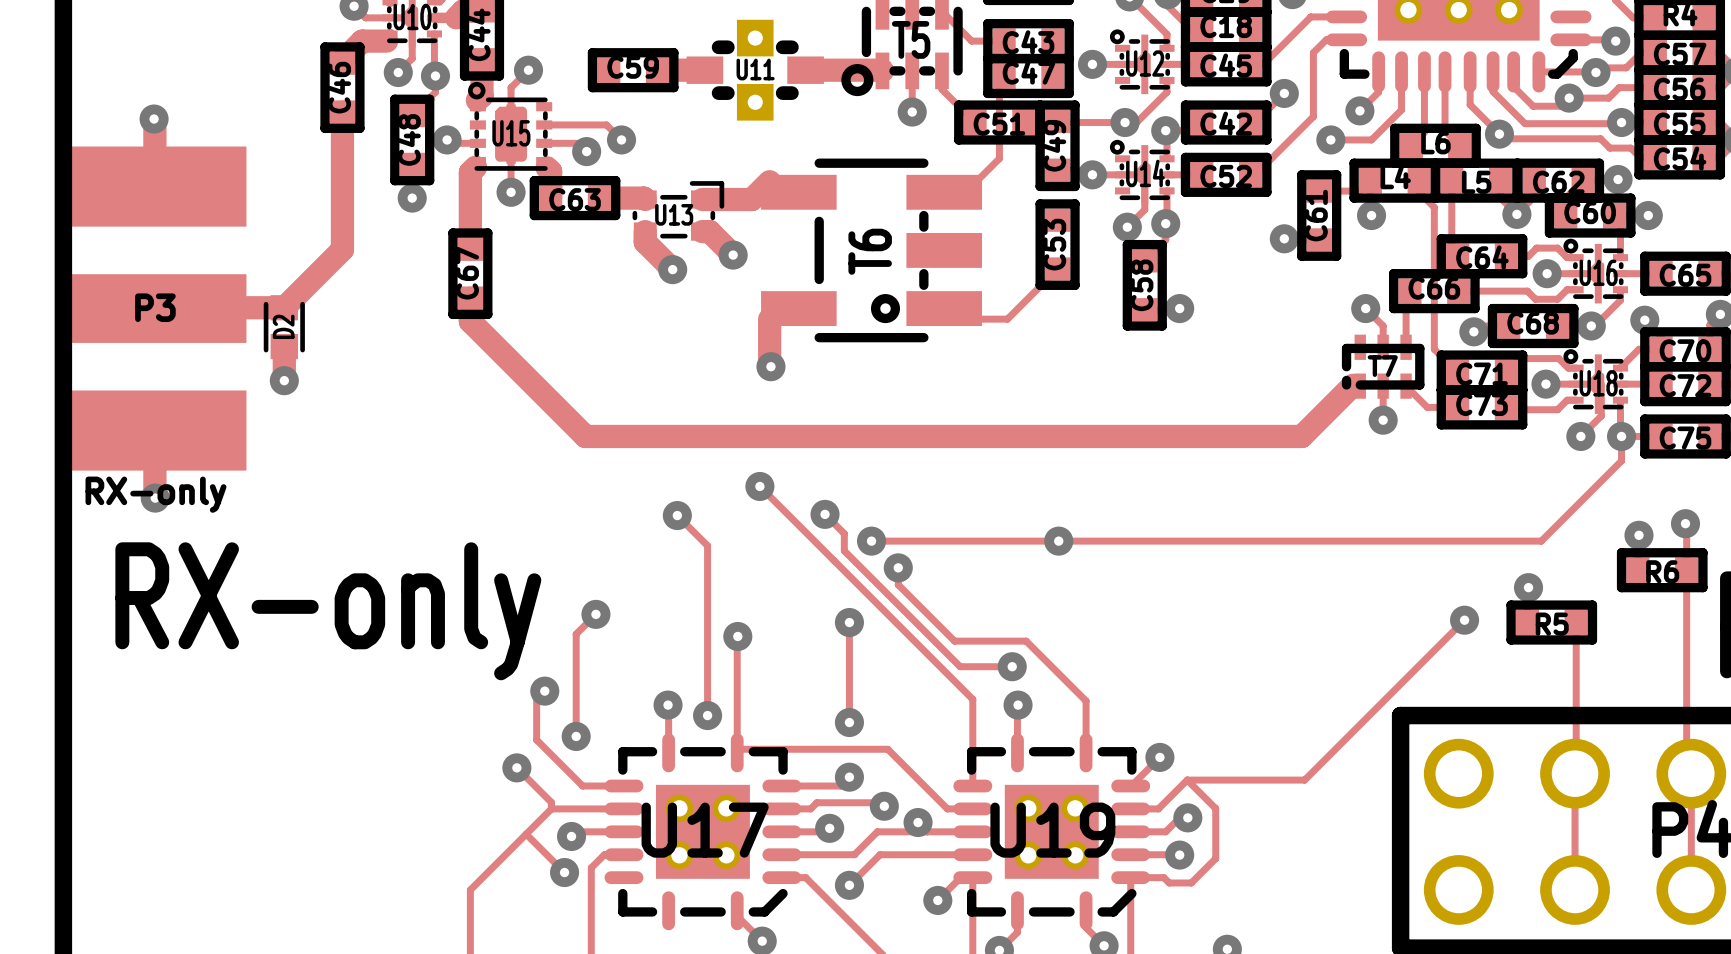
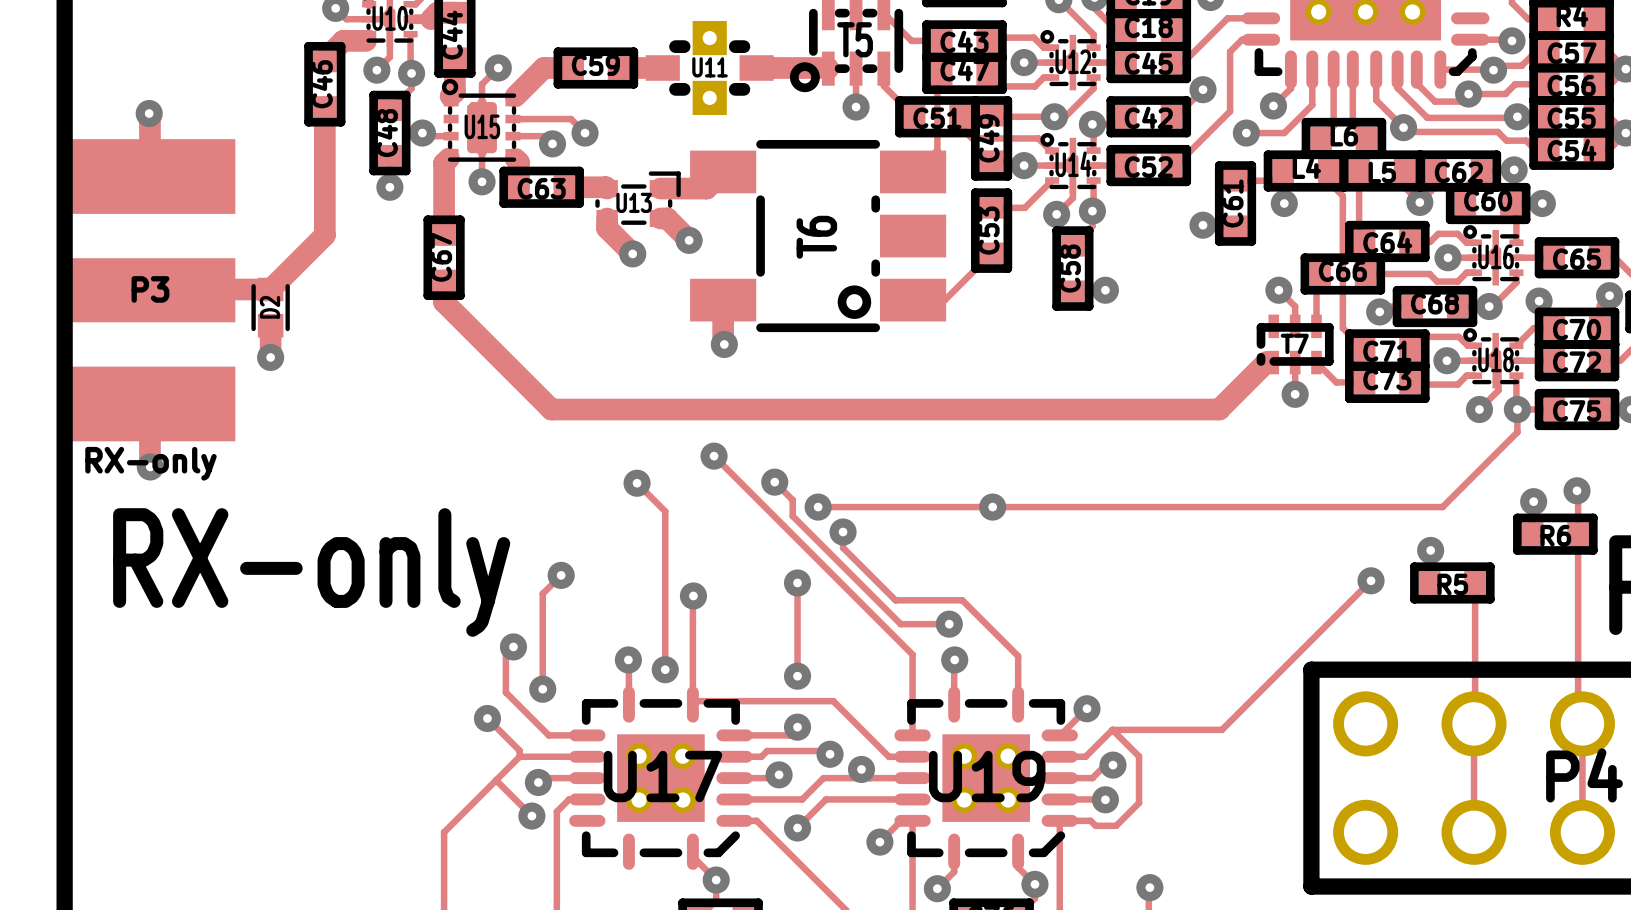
track: none -> (987, 40) (990, 37) (1033, 37) (1043, 47) (1052, 47)
track: none -> (573, 67) (543, 67) (512, 98) (512, 102)
track: none -> (987, 73) (1000, 86) (1034, 86) (1043, 77) (1052, 77)
track: none -> (960, 116) (960, 126) (972, 138) (1038, 138) (1052, 152) (1052, 150)
T6 footprint: [761, 158, 983, 343] -> [690, 139, 947, 333]
track: none -> (1052, 180) (1024, 207) (991, 207)

